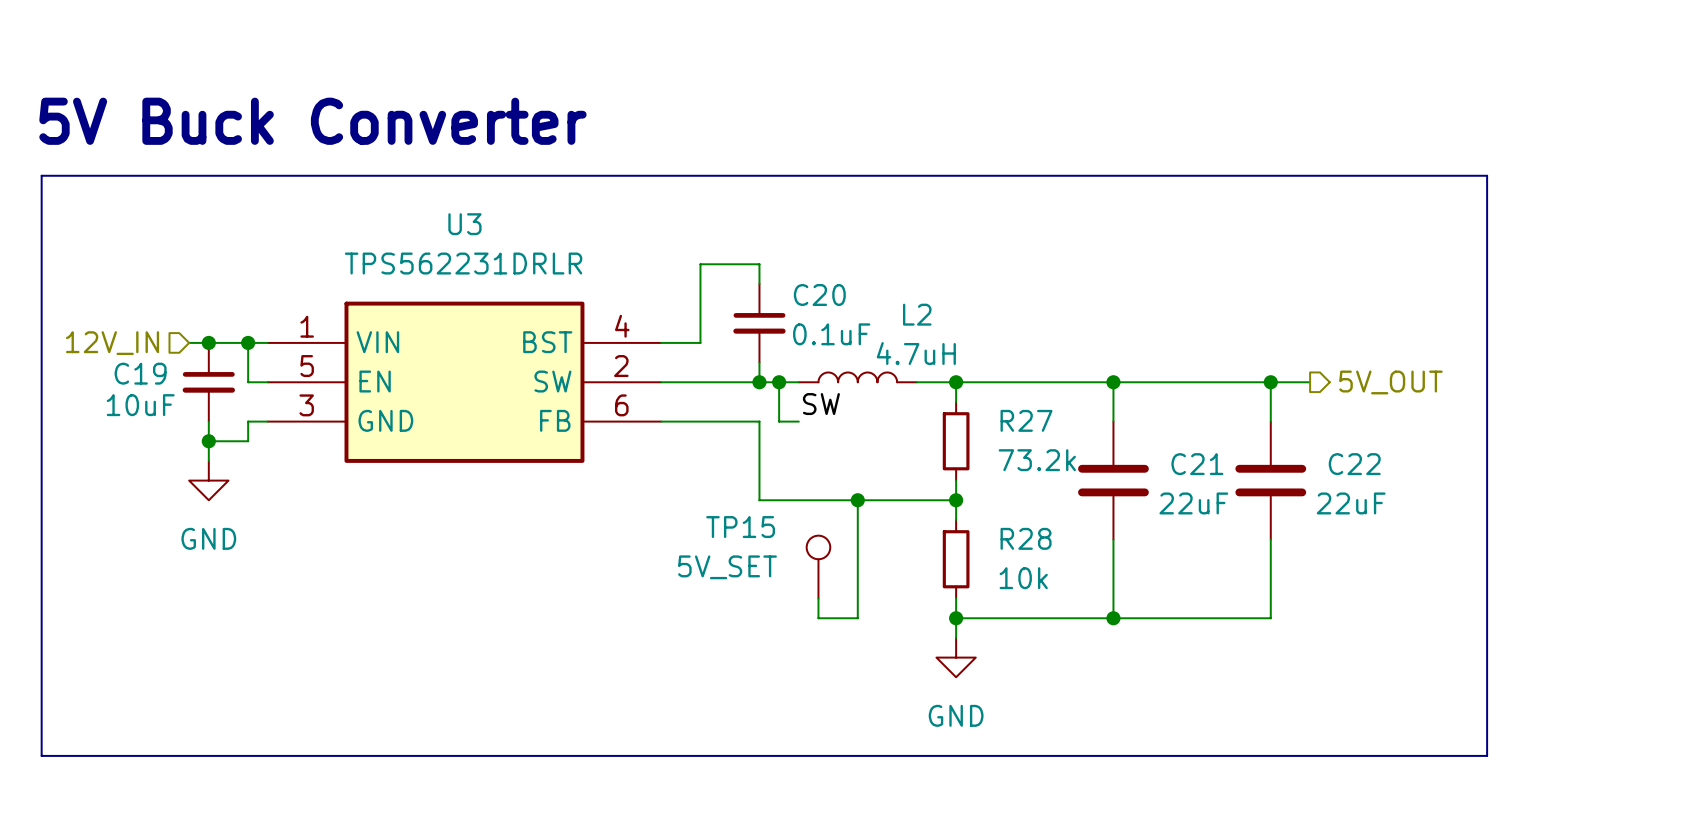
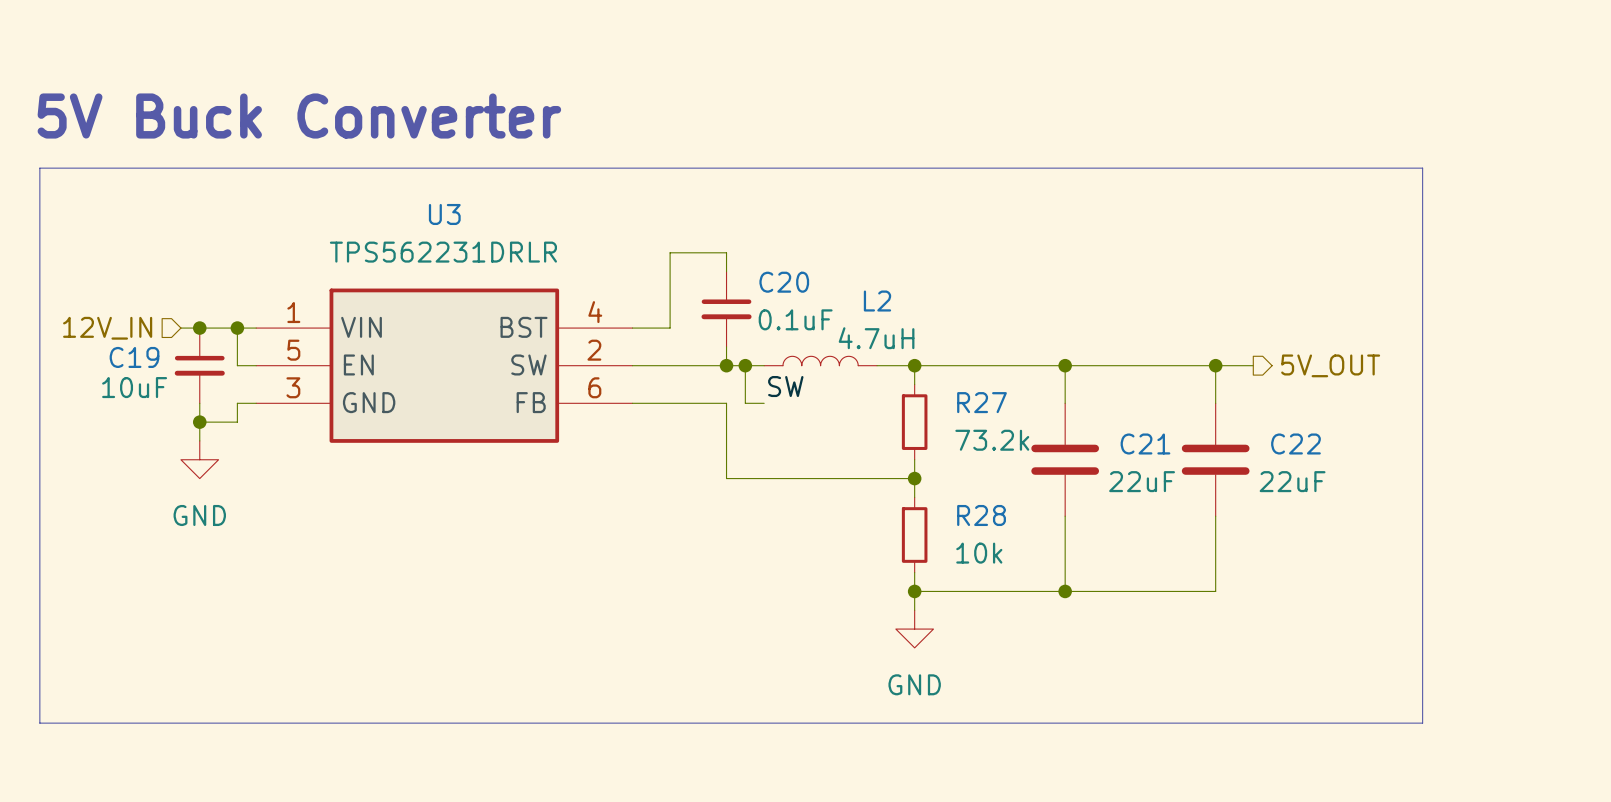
wire: (857, 500) (857, 618) (818, 618) (818, 598) -> none
junction: (857, 500) -> none
TP15: 5V_SET (818, 567) -> none

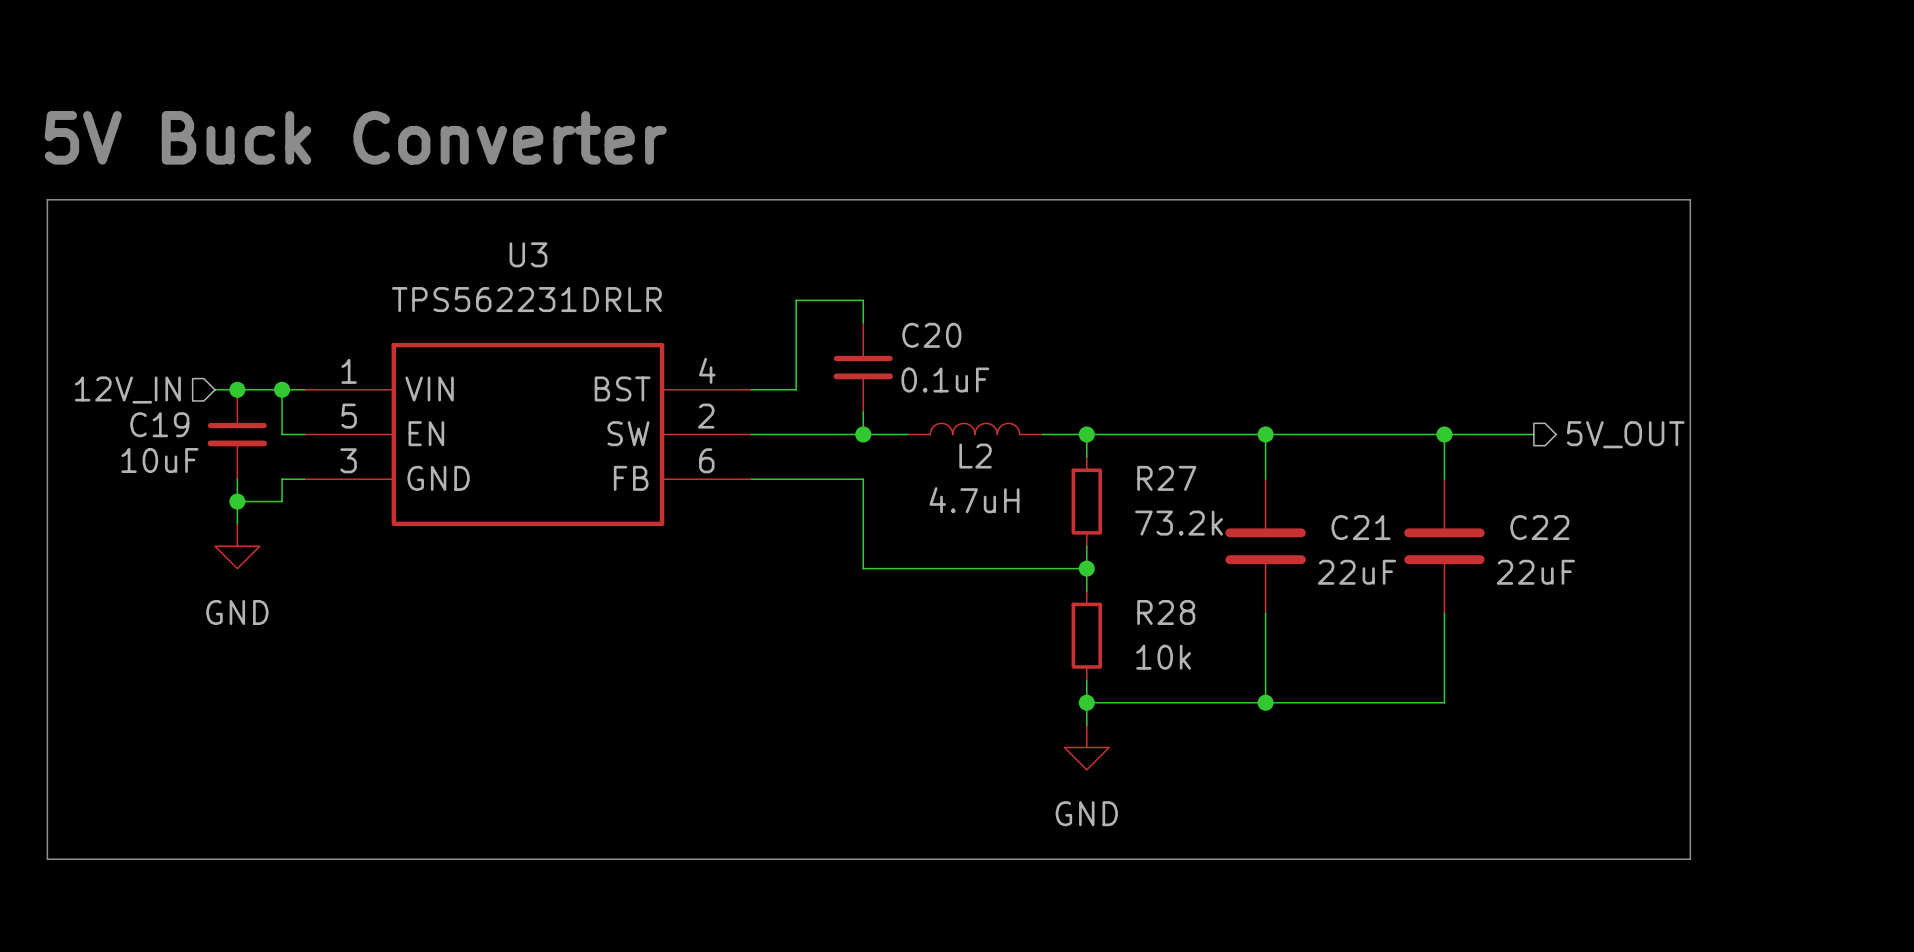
L2 name position: L2 (877, 301) -> L2 (975, 456)
L2 value position: 4.7uH (876, 338) -> 4.7uH (974, 500)
wire: (745, 365) (745, 403) (764, 403) -> none
junction: (745, 365) -> none
wire: none -> (1489, 434) (1533, 434)
hierarchical label position: 5V_OUT (1330, 365) -> 5V_OUT (1625, 434)
label: SW (785, 386) -> none

